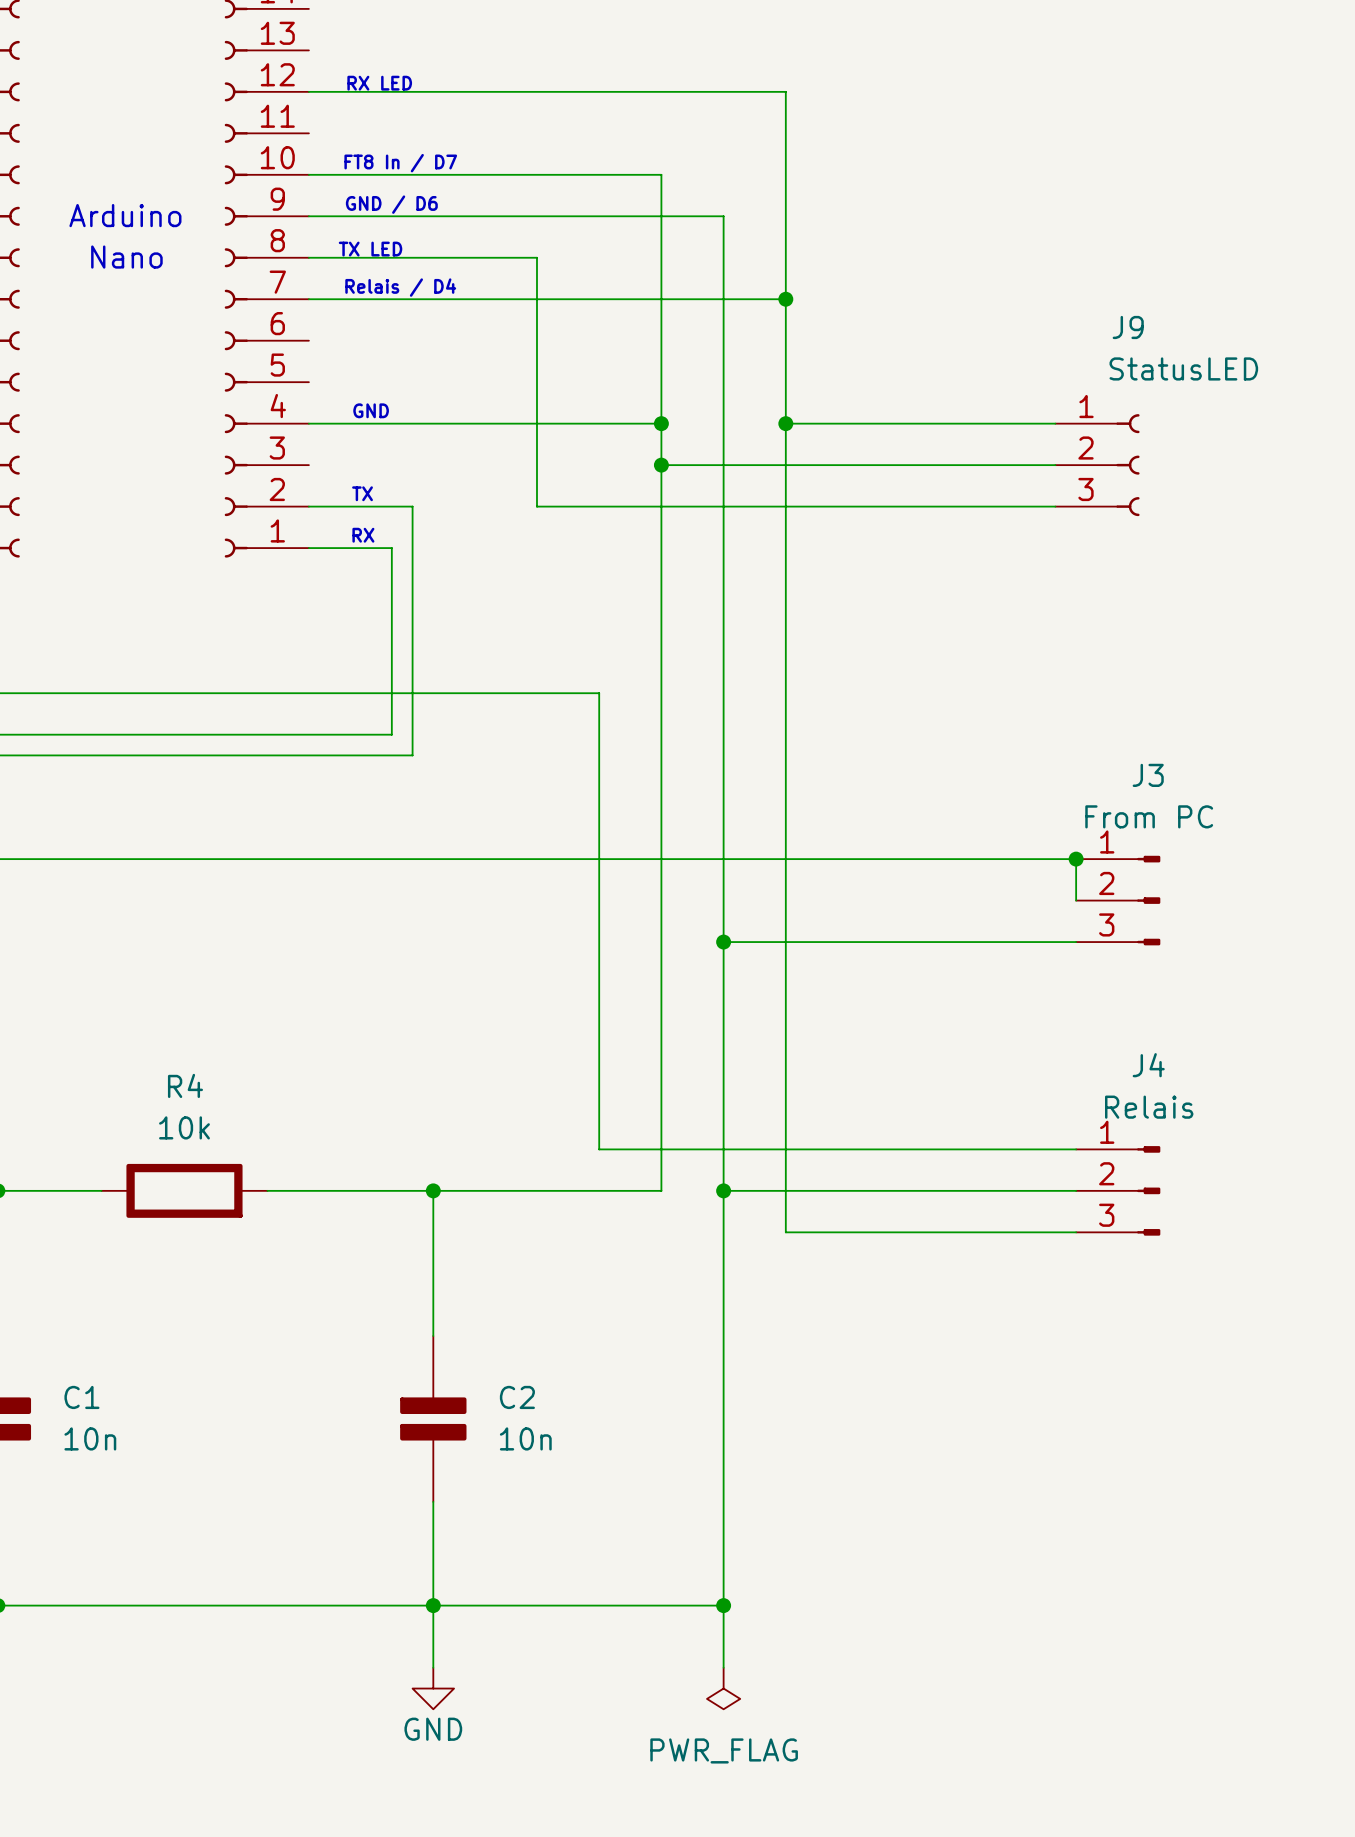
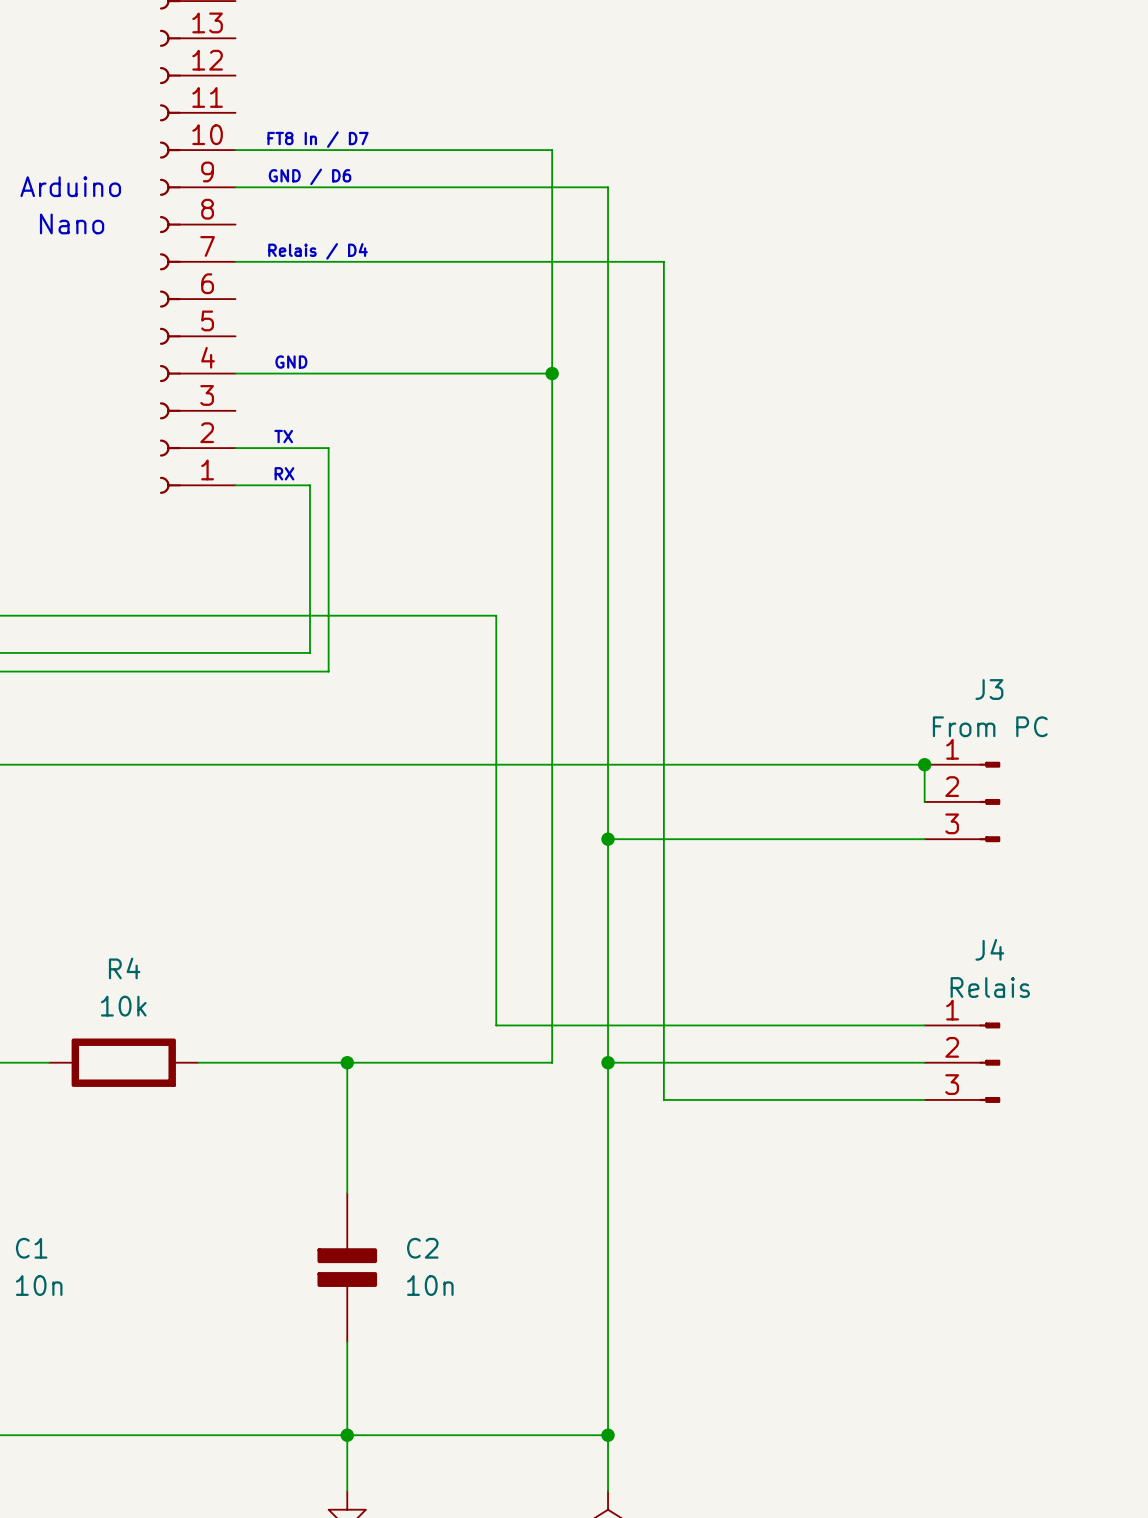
text: RX LED (379, 83) -> none
wire: (308, 91) (785, 91) (785, 299) -> none
text: TX LED (370, 249) -> none
wire: (308, 257) (536, 257) (536, 506) (1055, 506) -> none
junction: (785, 299) -> none
wire: (785, 423) (1055, 423) -> none
junction: (785, 423) -> none
wire: (661, 465) (1055, 465) -> none
junction: (661, 465) -> none
J9: StatusLED (1097, 465) -> none

